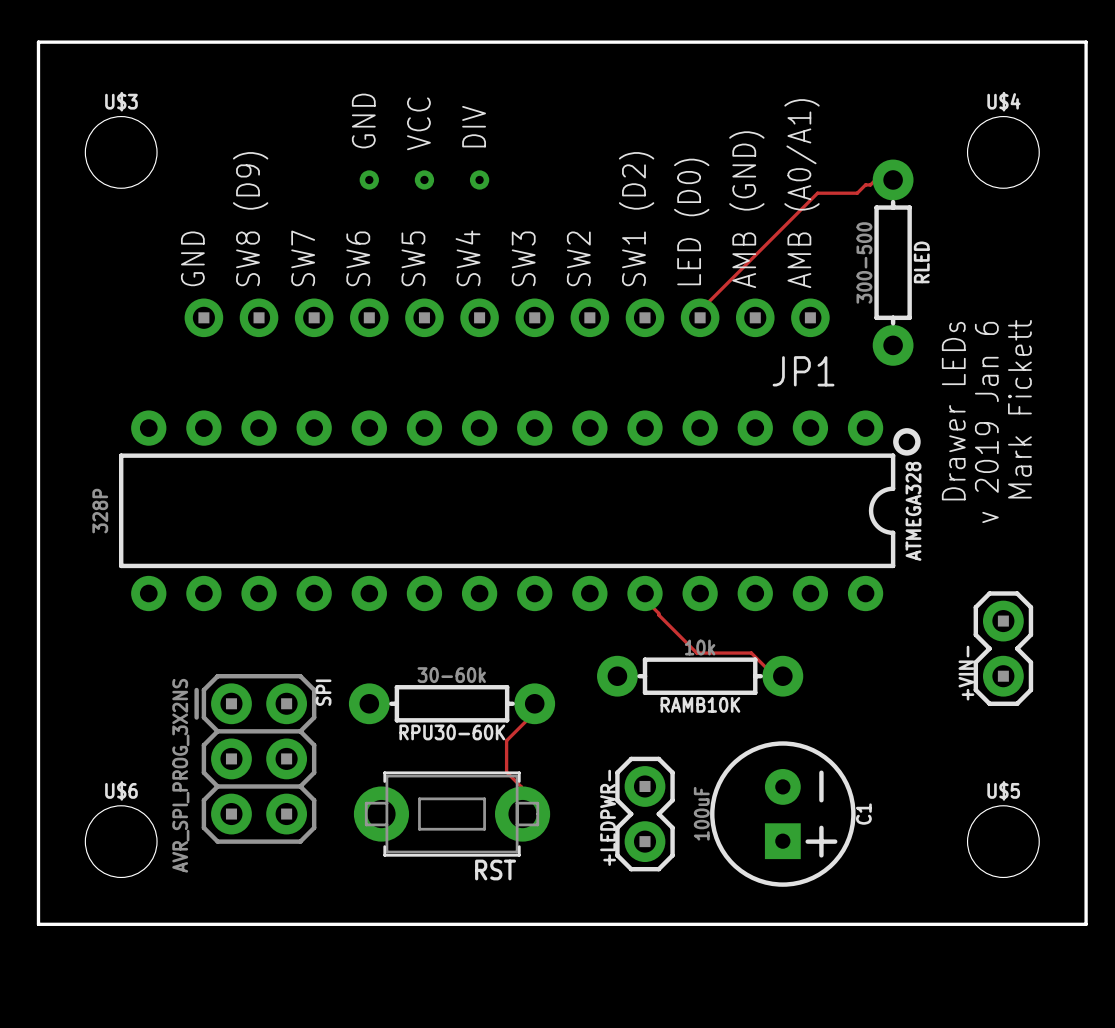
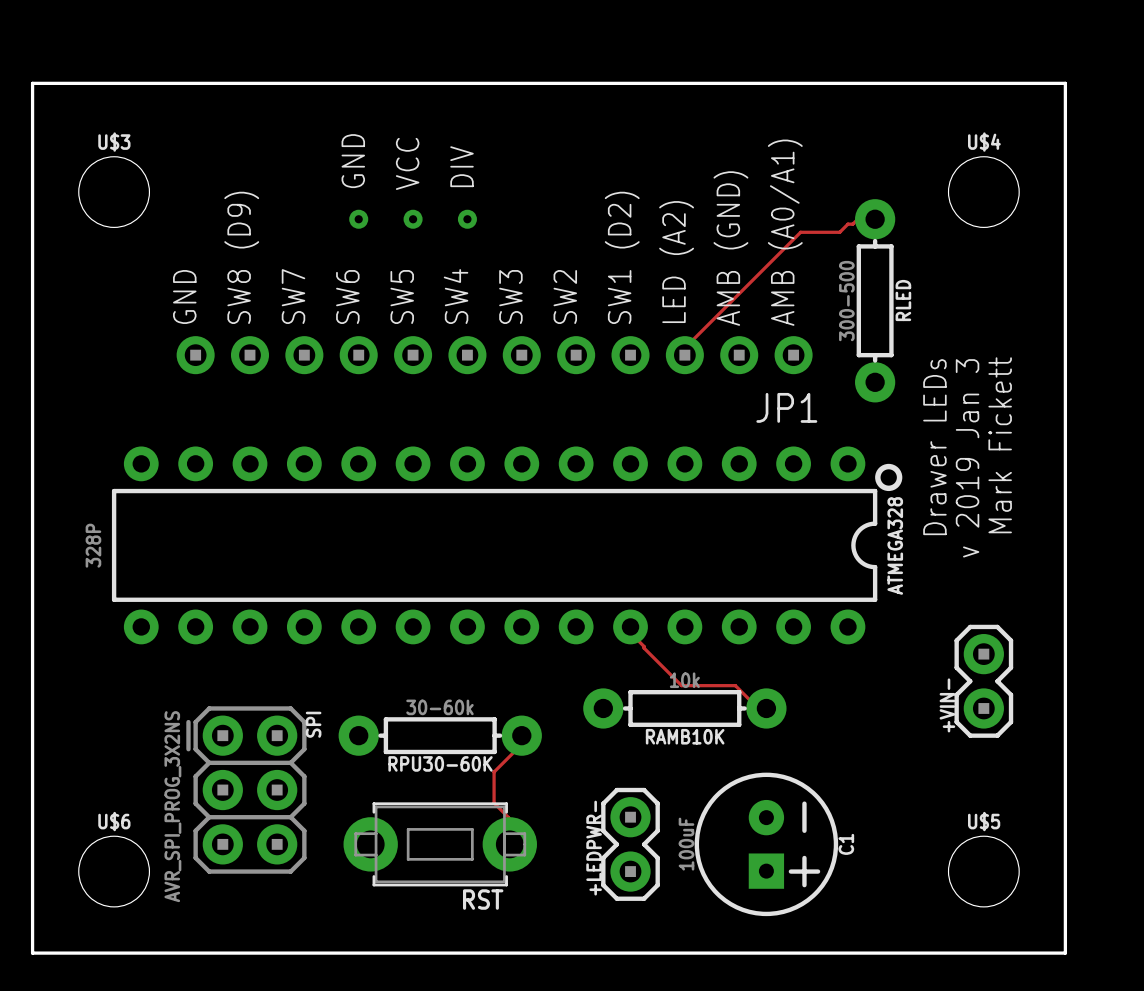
text: LED (D0) (691, 221) -> LED (A2) (676, 262)
text: v 2019 Jan 6 (986, 422) -> v 2019 Jan 3 (967, 458)

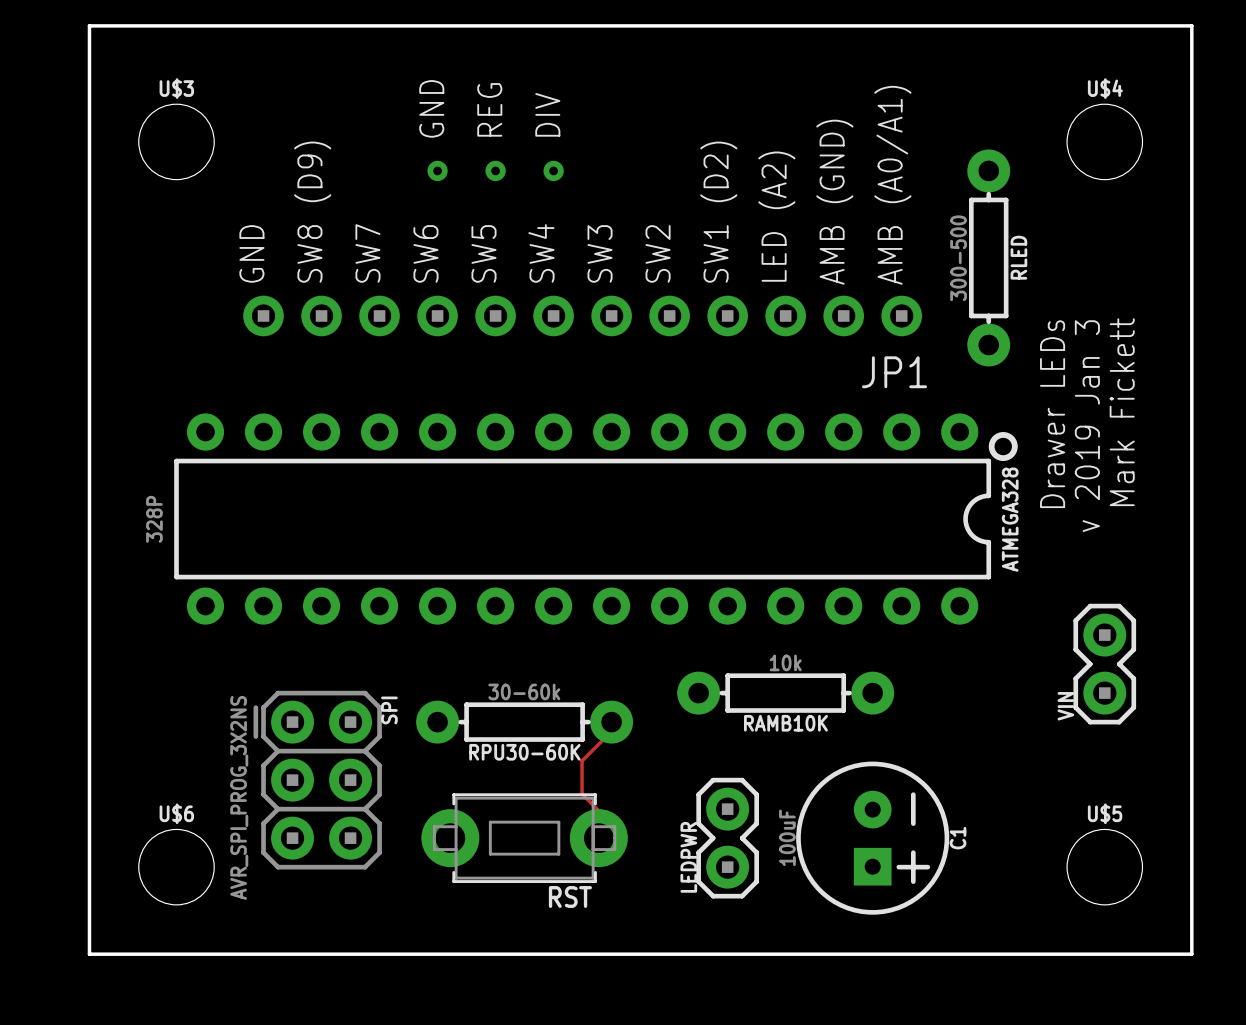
text: VCC (407, 163) -> REG (489, 109)
track: (875, 219) (857, 219) (852, 224) (847, 224) (839, 232) (800, 232) (684, 348) (684, 355) -> none
track: (630, 626) (631, 633) (681, 685) (735, 685) (758, 708) (766, 708) -> none
+VIN- name: +VIN- (947, 705) -> VIN (1065, 706)
+LEDPWR- name: +LEDPWR- (594, 848) -> LEDPWR (688, 857)

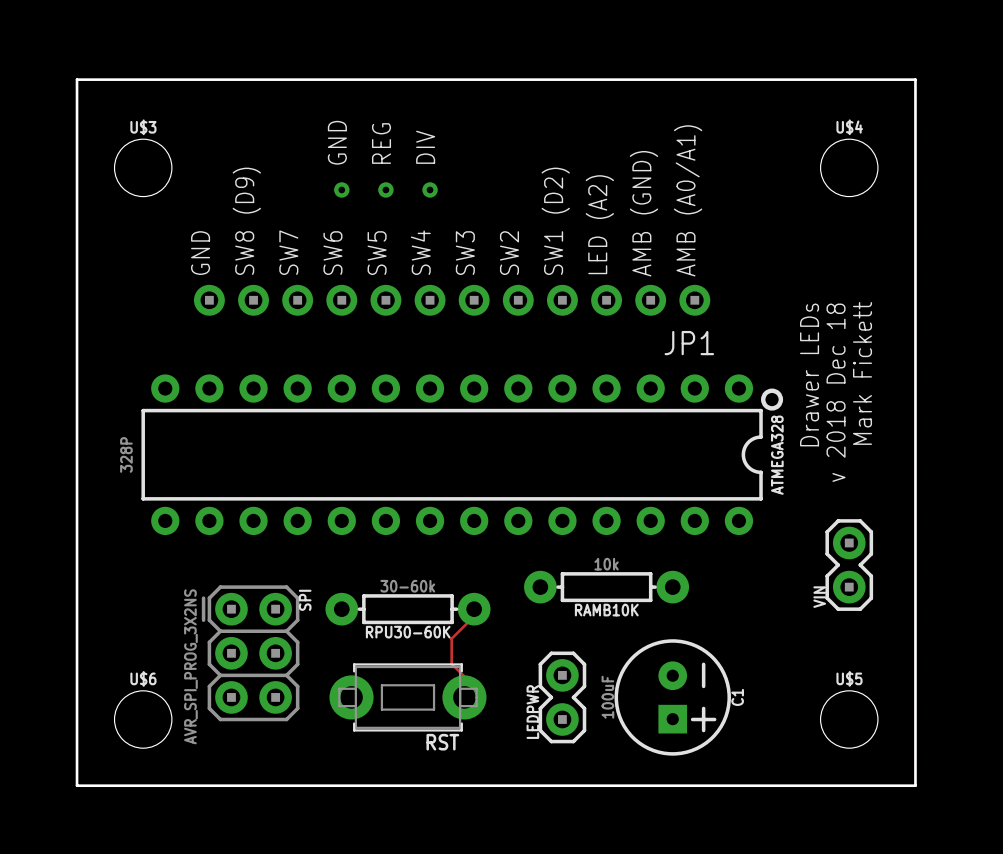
RLED: 300-500 (988, 257) -> none
text: v 2019 Jan 3 (1087, 426) -> v 2018 Dec 18 (836, 392)

